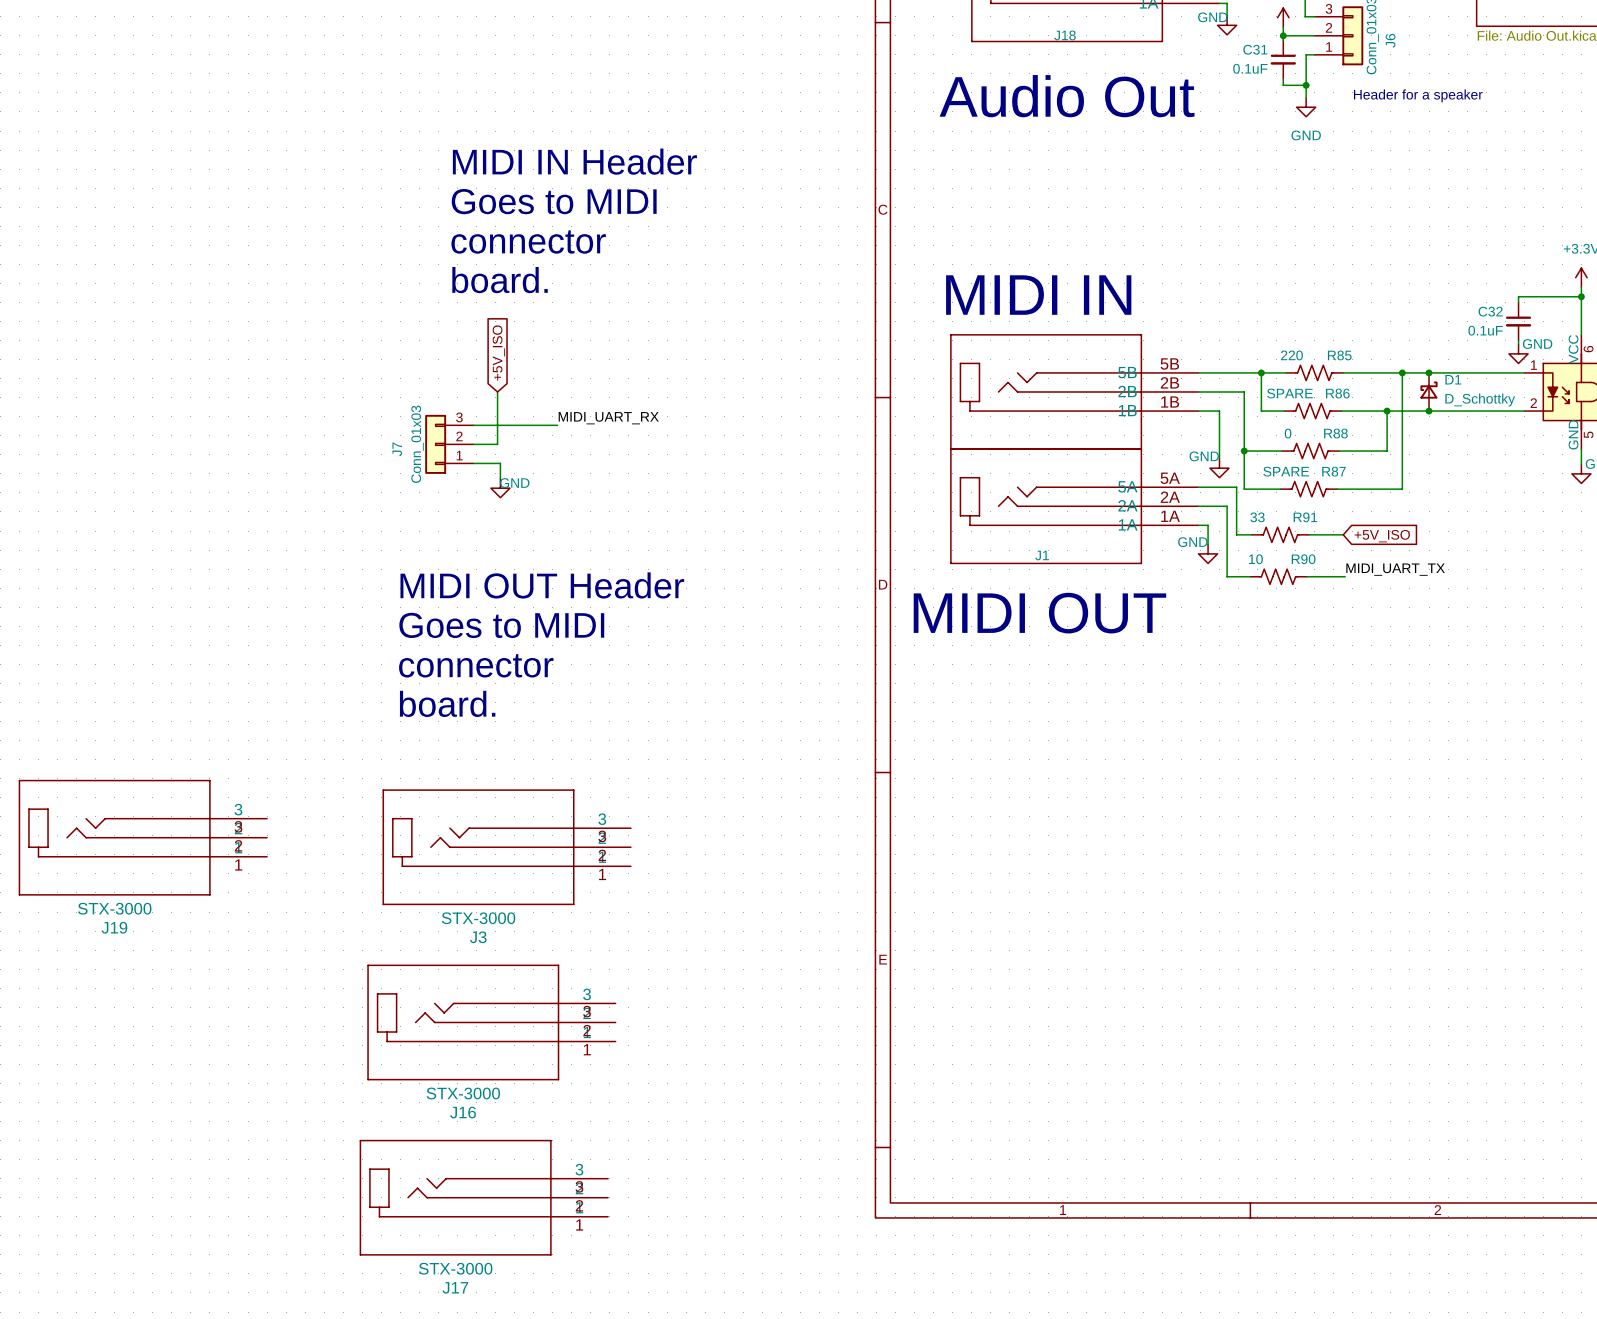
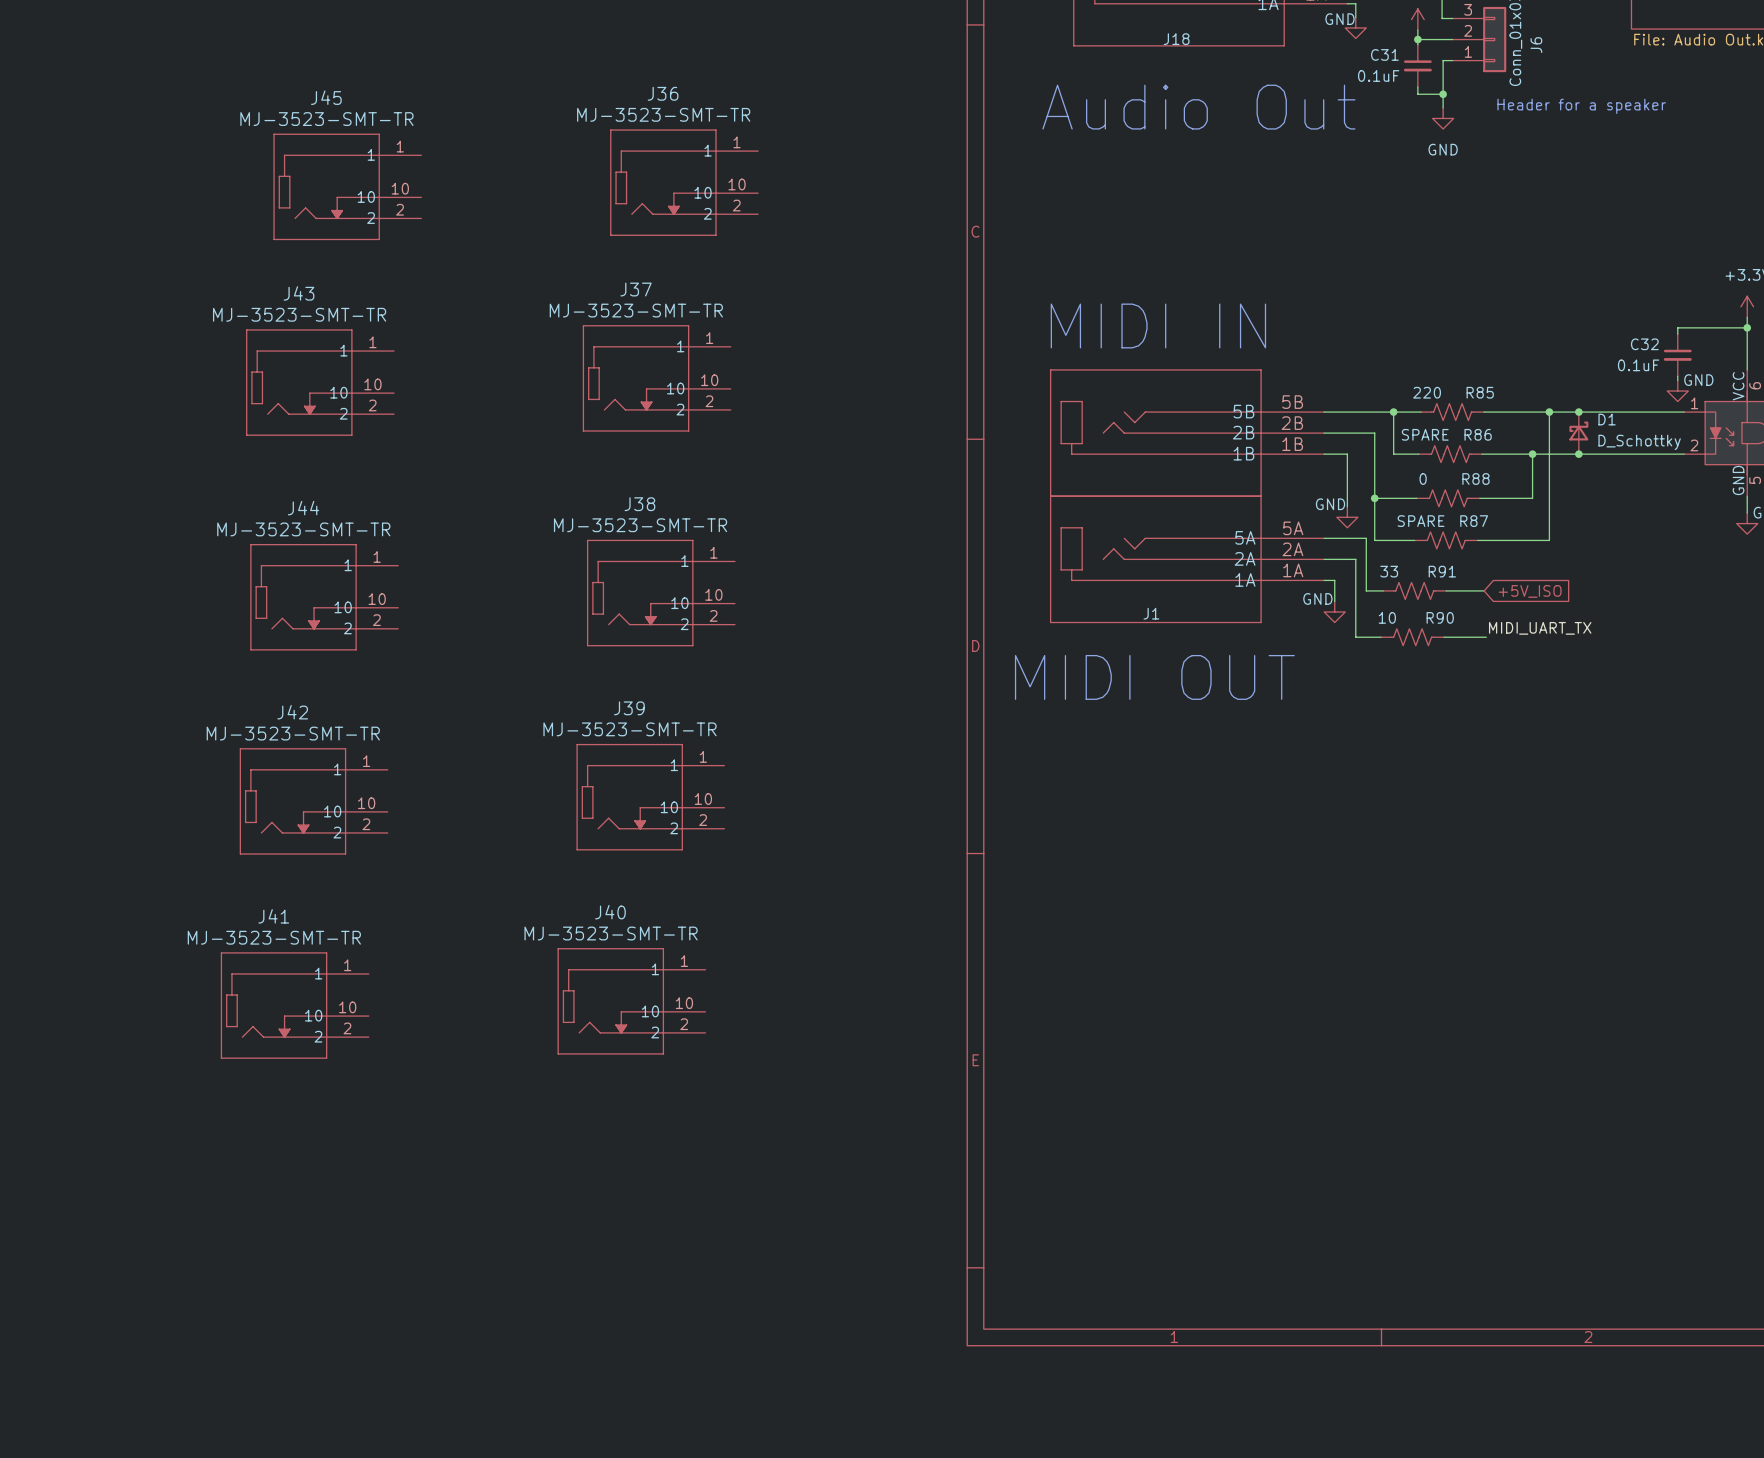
text: MIDI IN Header (574, 161) -> none
J36: none -> MJ-3523-SMT-TR (684, 182)
J45: none -> MJ-3523-SMT-TR (347, 186)
text: Goes to MIDI (554, 201) -> none
text: connector (528, 242) -> none
text: board. (499, 280) -> none
J37: none -> MJ-3523-SMT-TR (656, 378)
J43: none -> MJ-3523-SMT-TR (320, 382)
global label: +5V_ISO (498, 352) -> none
wire: (497, 391) (497, 444) (473, 444) -> none
label: MIDI_UART_RX (608, 418) -> none
wire: (473, 425) (557, 425) -> none
J7: Conn_01x03 (449, 444) -> none
wire: (473, 463) (500, 463) (500, 478) -> none
power symbol: GND (500, 488) -> none
J38: none -> MJ-3523-SMT-TR (661, 593)
J44: none -> MJ-3523-SMT-TR (324, 597)
text: MIDI OUT Header (542, 585) -> none
text: Goes to MIDI (501, 625) -> none
text: connector (476, 665) -> none
text: board. (447, 703) -> none
J39: none -> MJ-3523-SMT-TR (650, 797)
J42: none -> MJ-3523-SMT-TR (313, 801)
J19: STX-3000 (143, 837) -> none
J3: STX-3000 (506, 847) -> none
J40: none -> MJ-3523-SMT-TR (631, 1001)
J41: none -> MJ-3523-SMT-TR (294, 1005)
J16: STX-3000 (491, 1022) -> none
J17: STX-3000 (483, 1197) -> none

